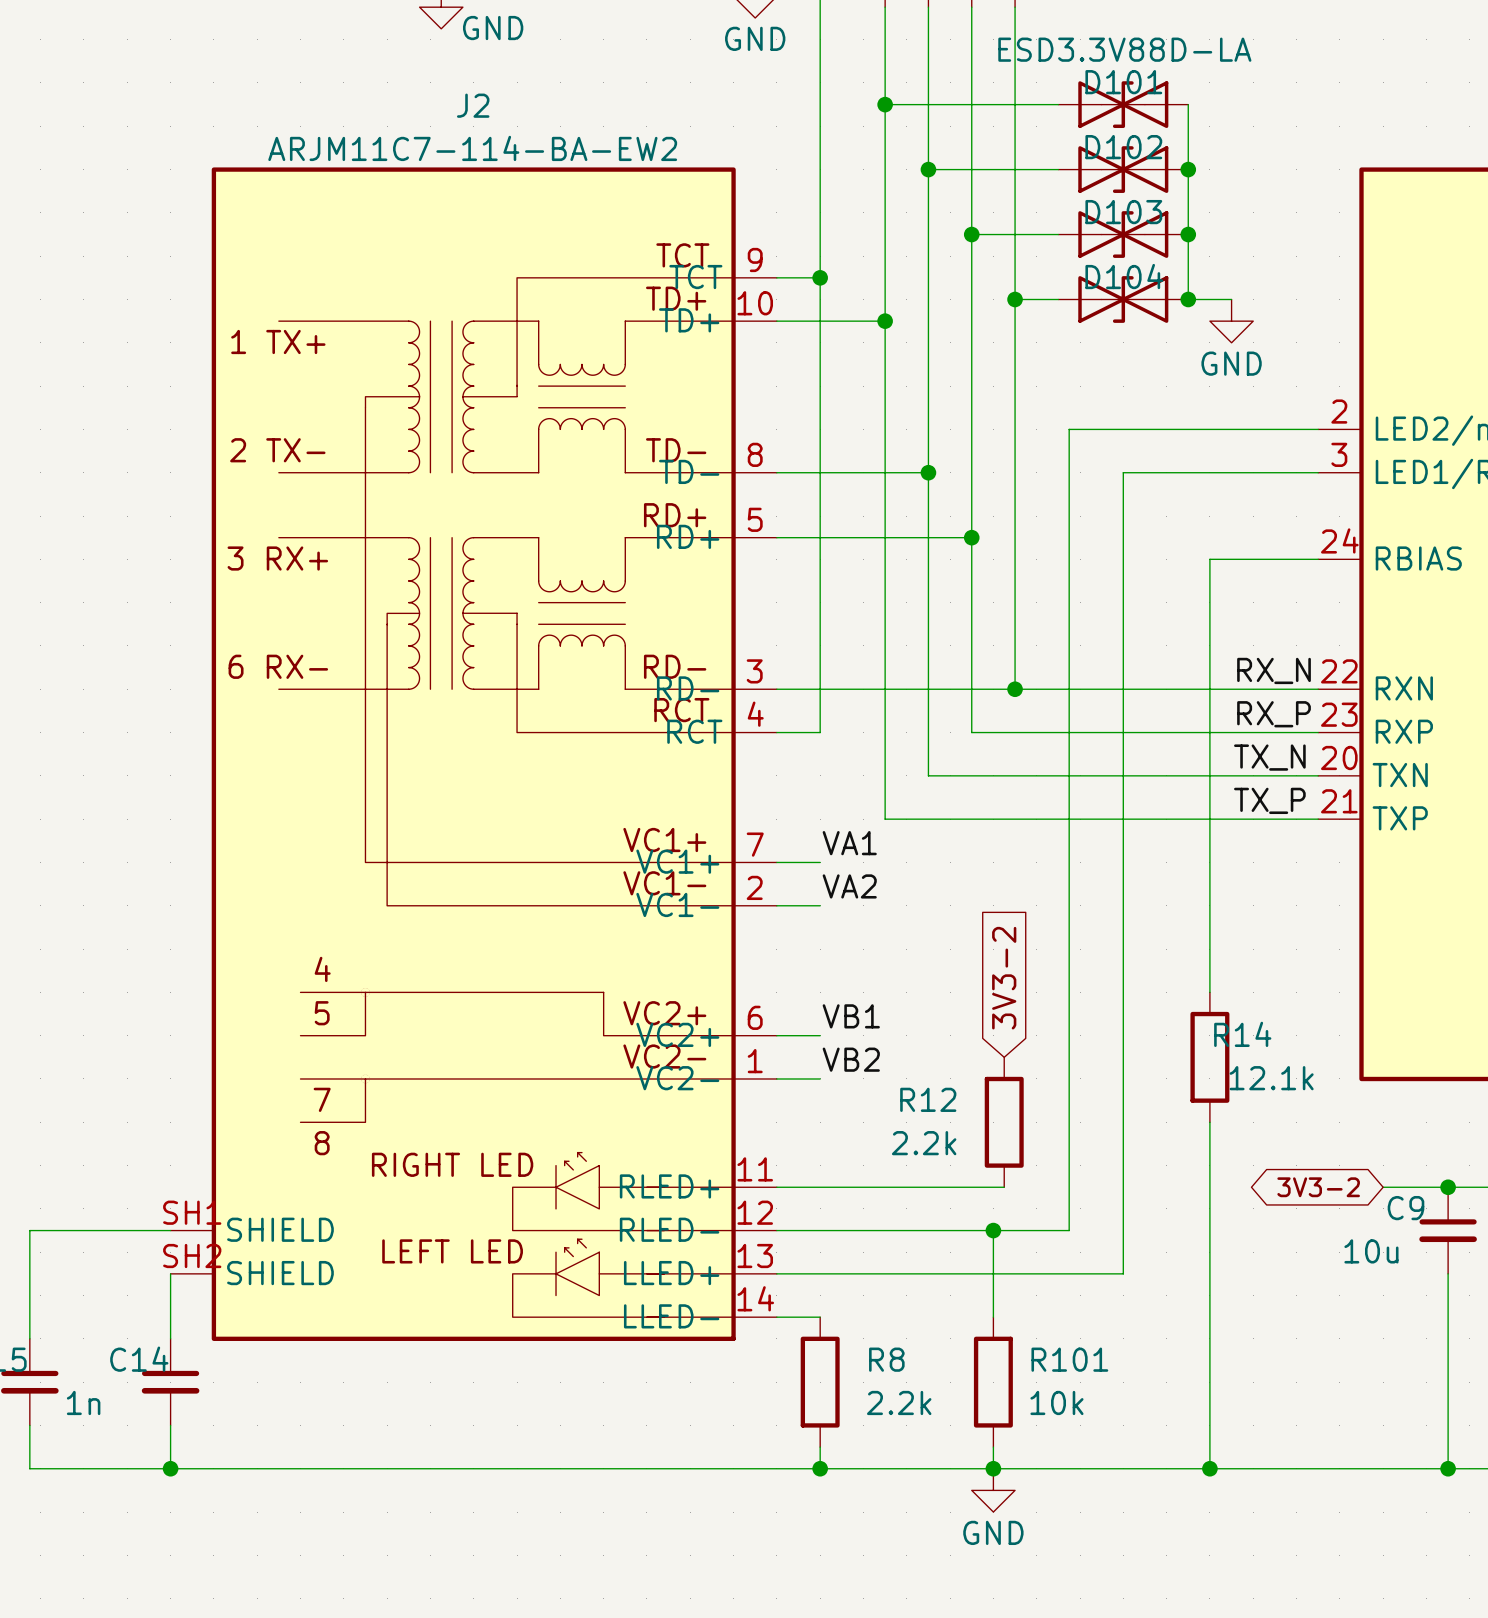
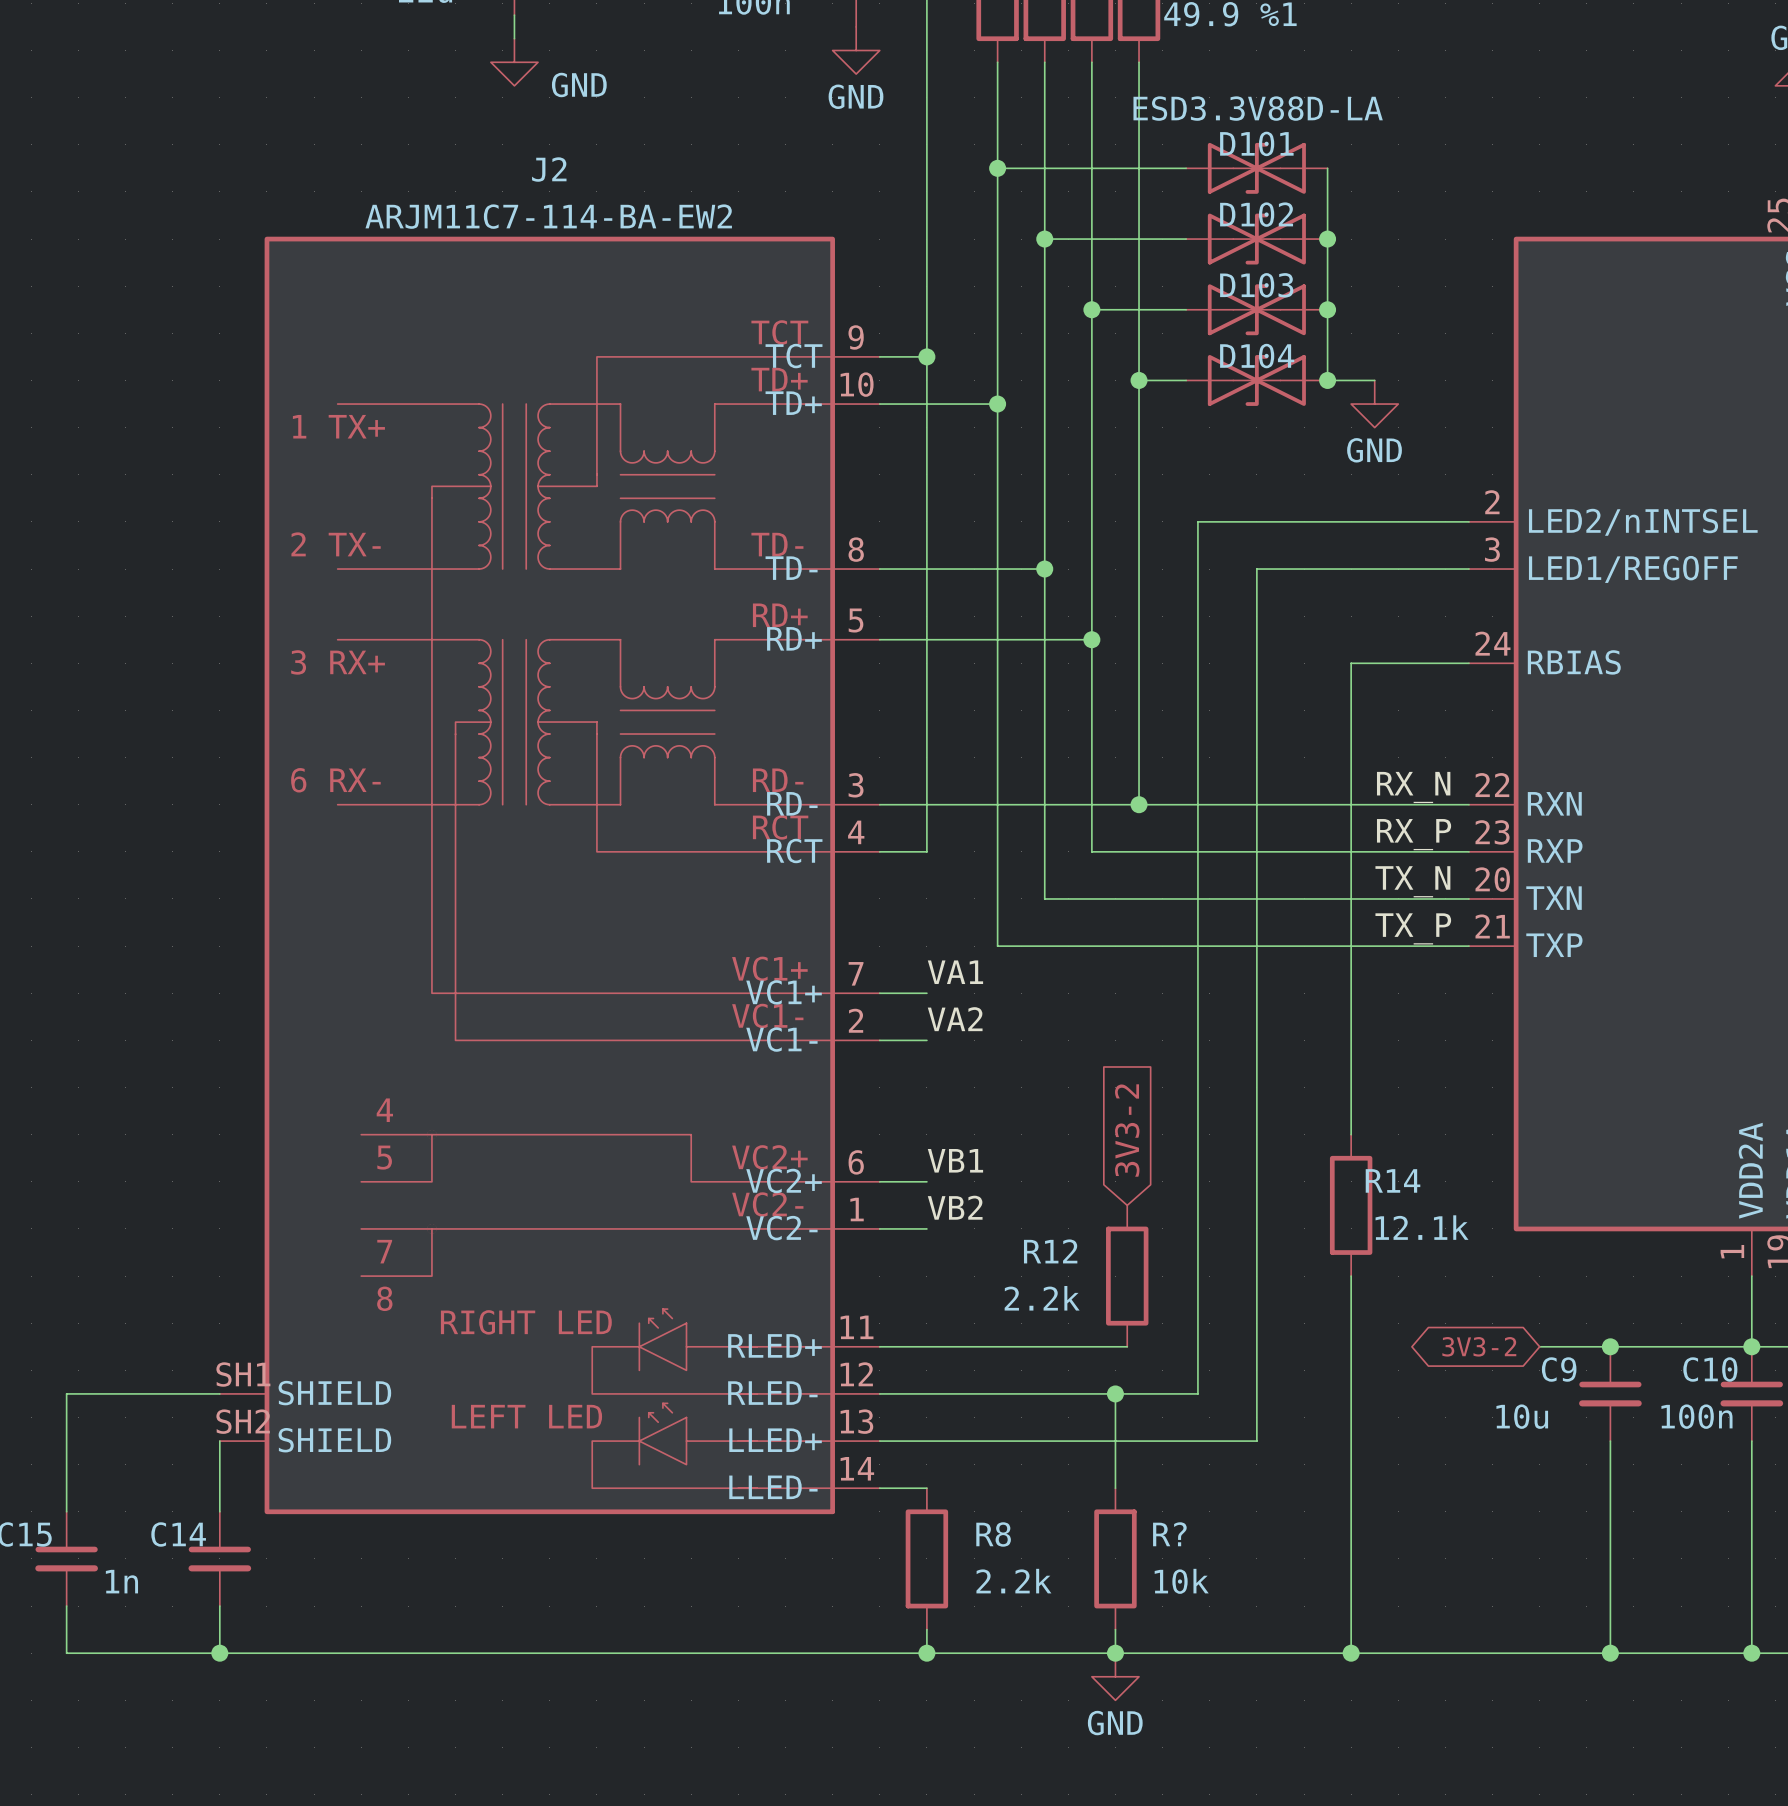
R101 name: R101 (1069, 1359) -> R? (1169, 1534)

